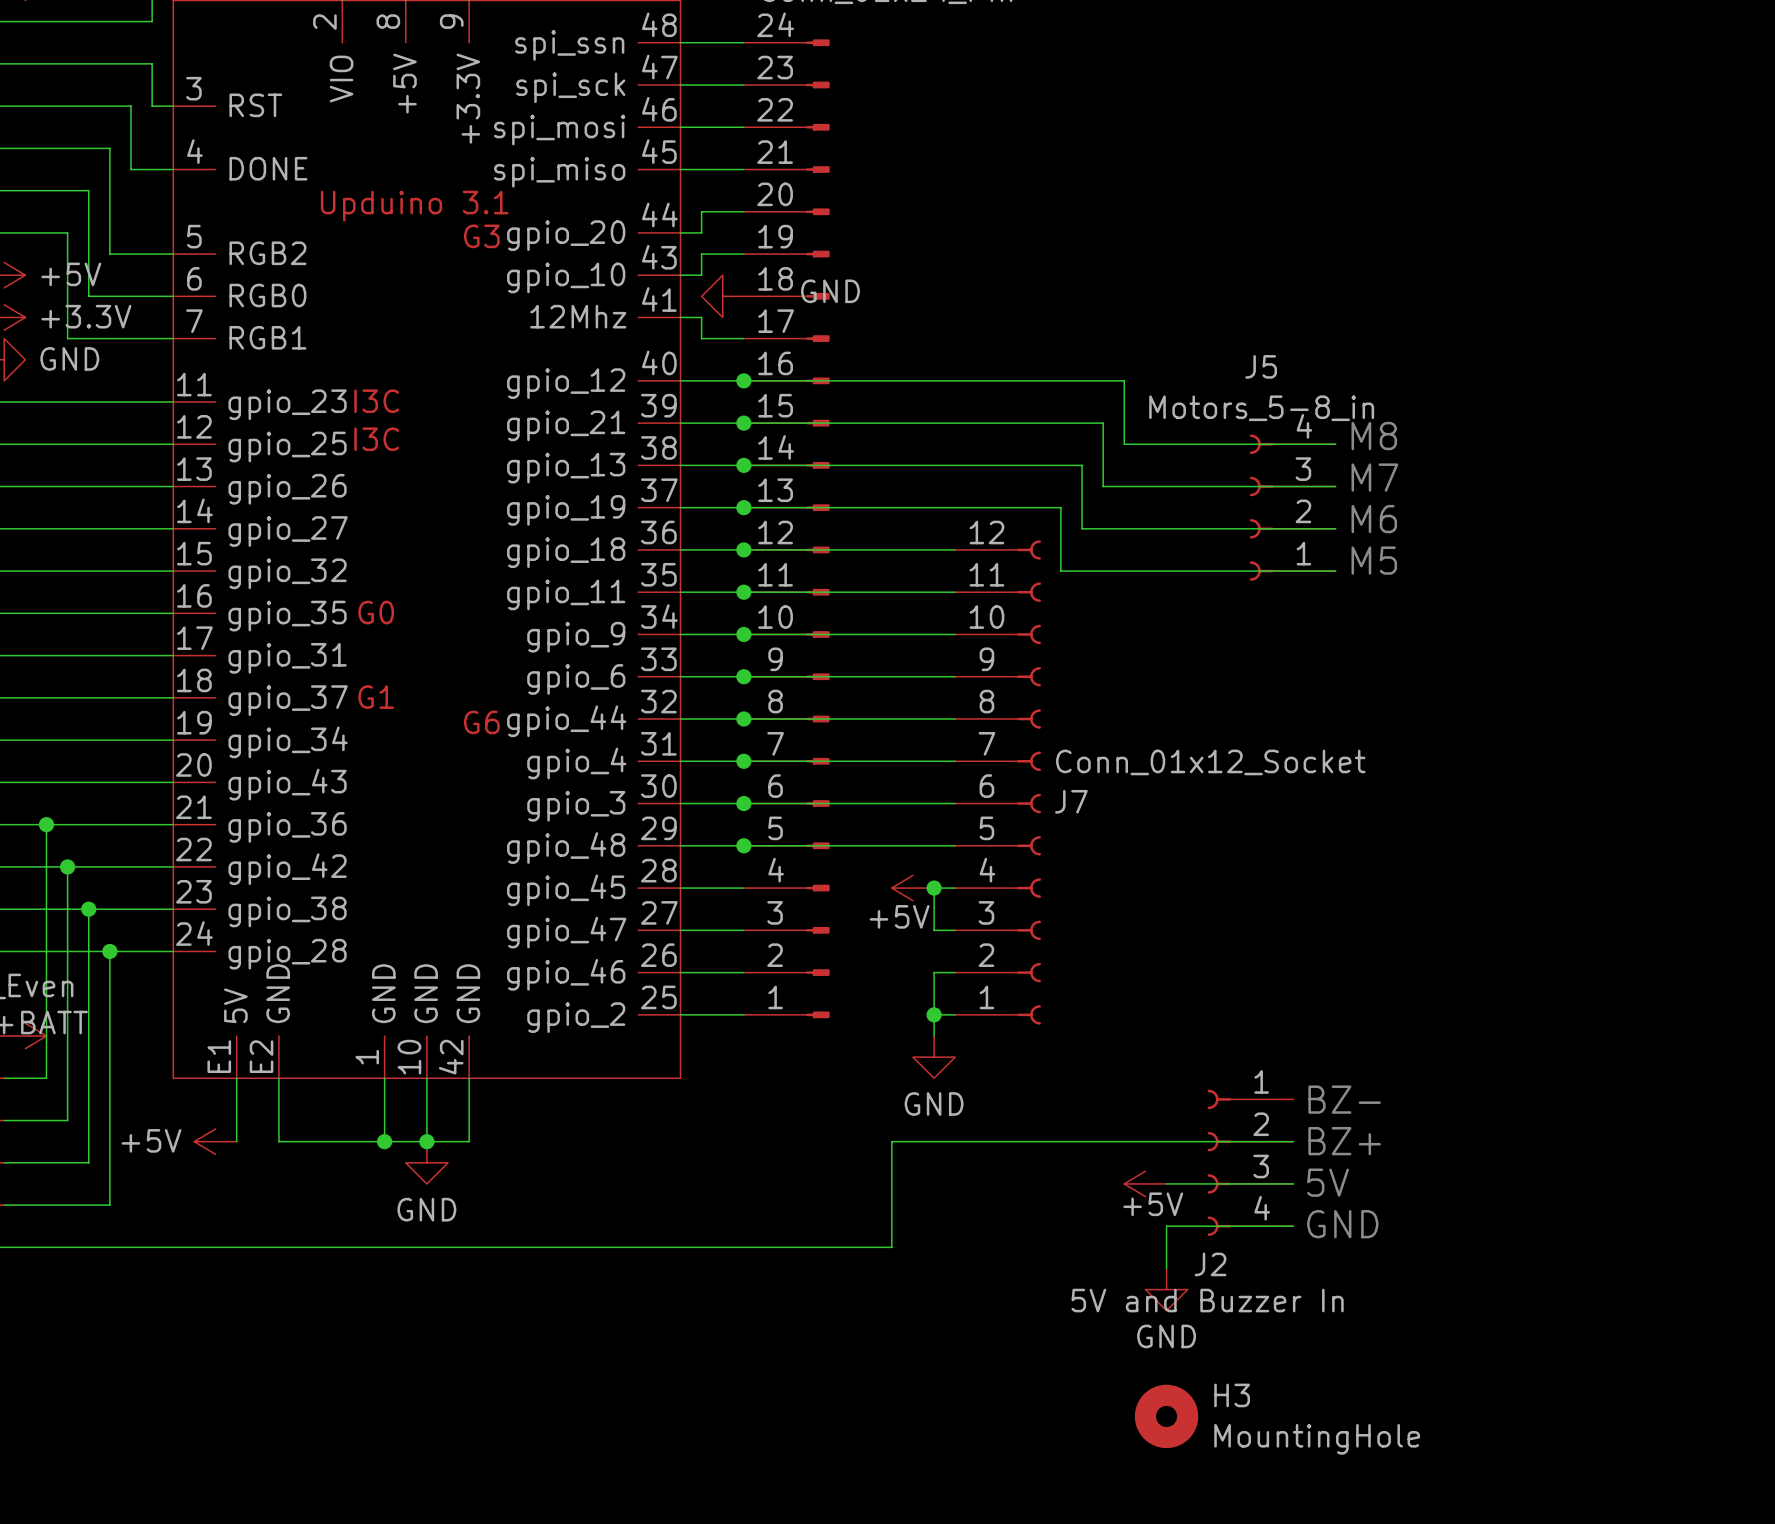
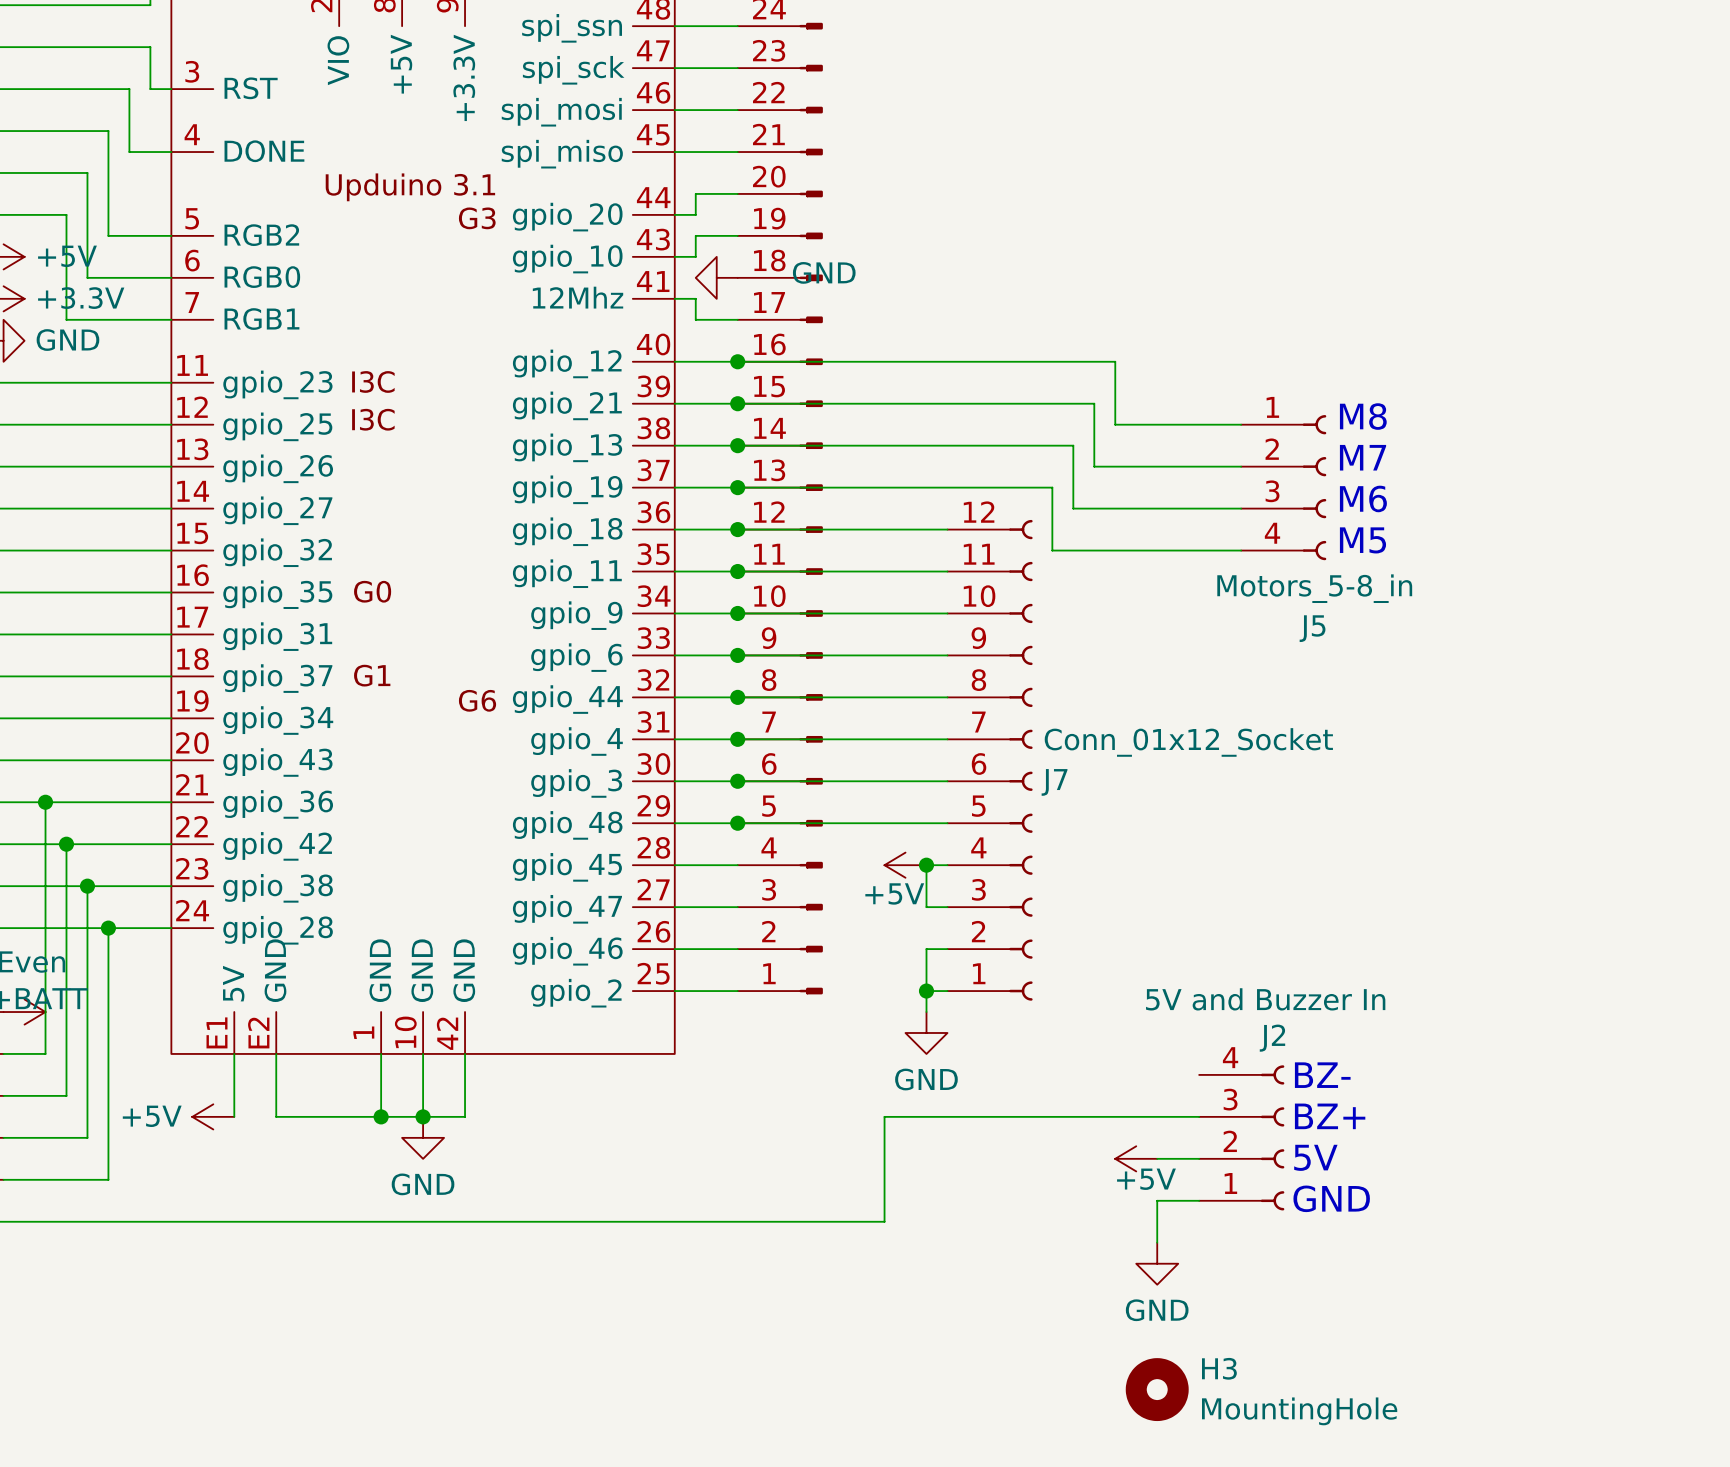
J5 rotation: 0° (1261, 507) -> 180° (1314, 487)
J2 rotation: 0° (1219, 1162) -> 180° (1272, 1137)

